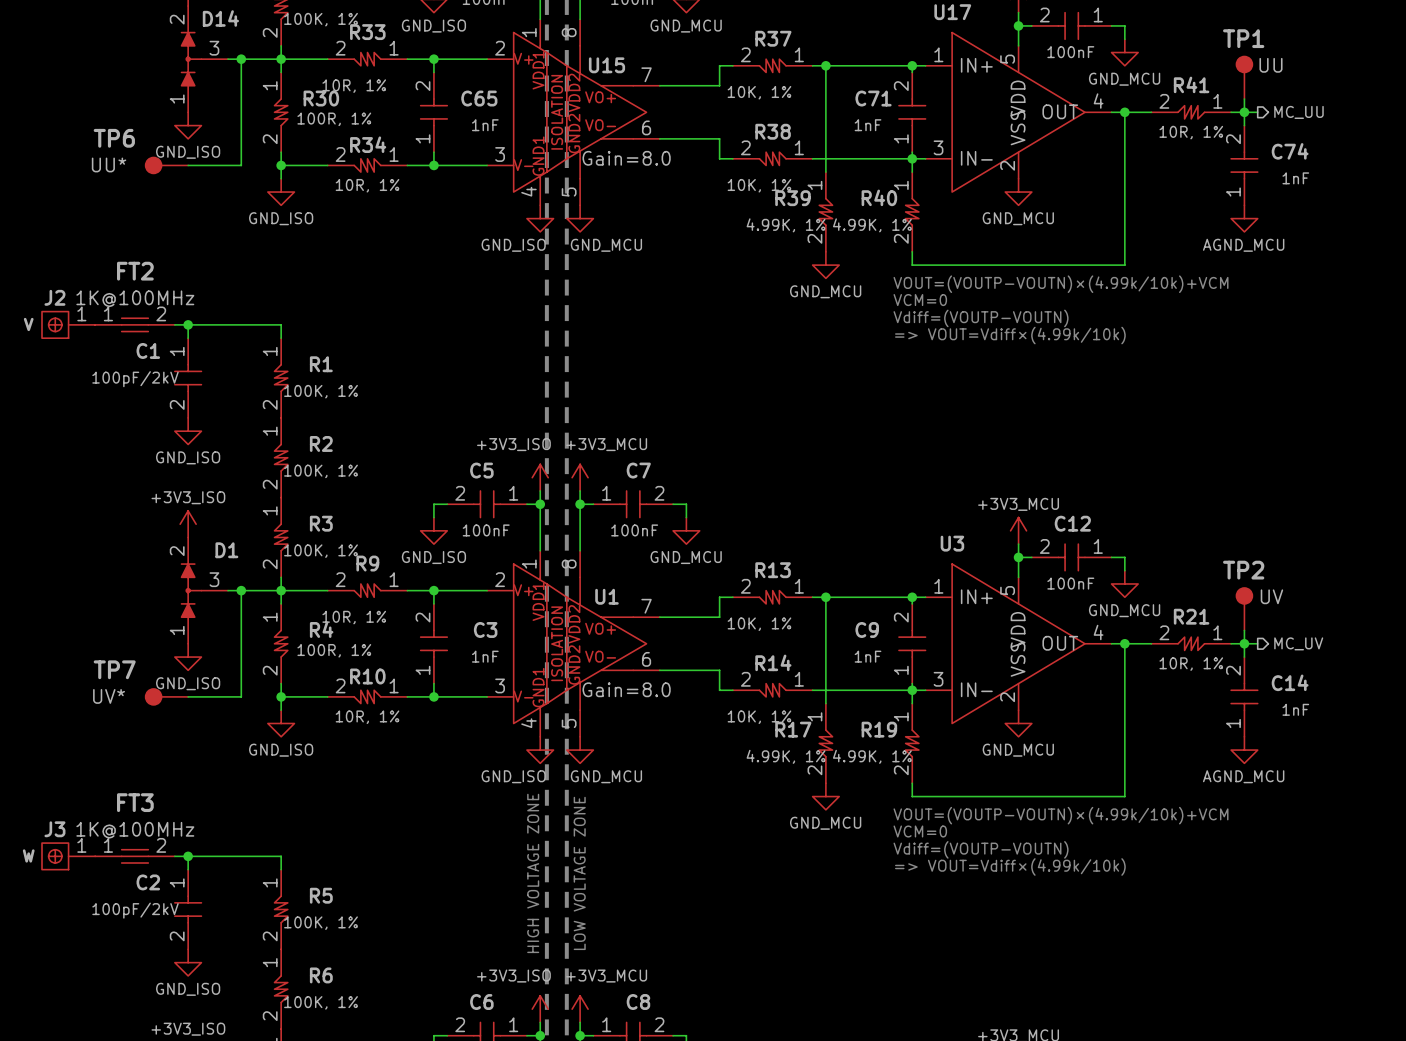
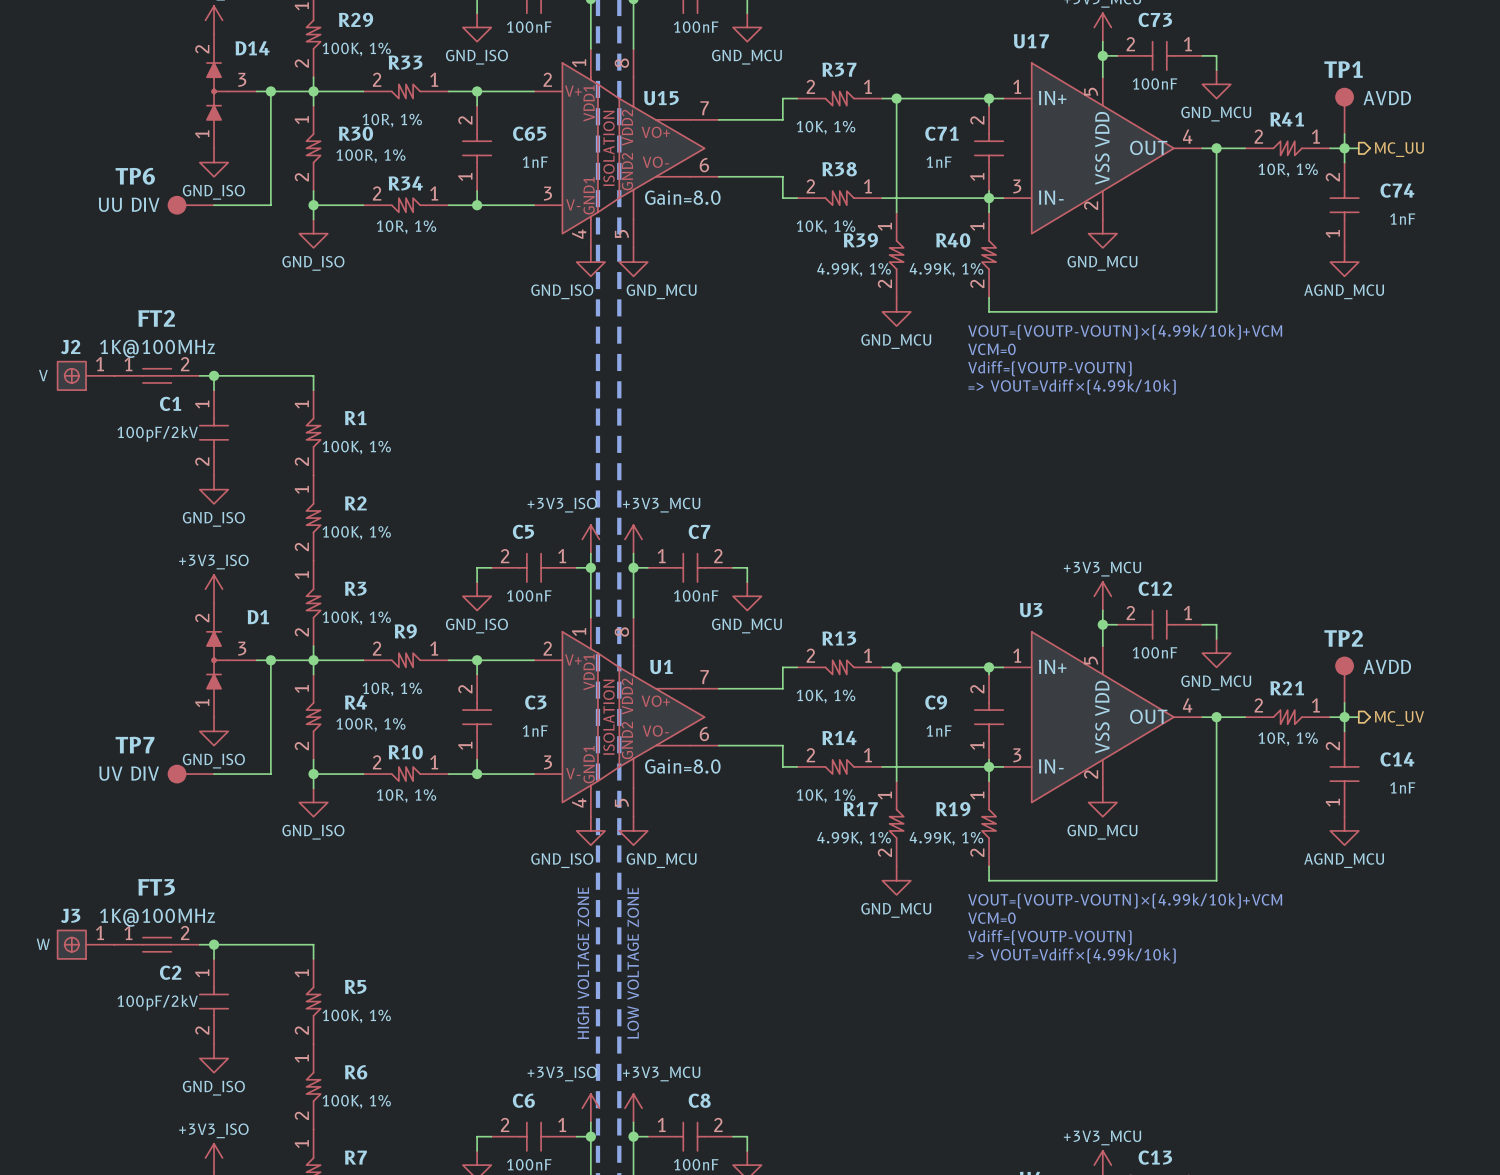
TP1 value: UU (1271, 65) -> AVDD (1387, 98)
TP6 value: UU* (109, 164) -> UU DIV (129, 204)
TP2 value: UV (1271, 596) -> AVDD (1387, 666)
TP7 value: UV* (109, 696) -> UV DIV (129, 773)

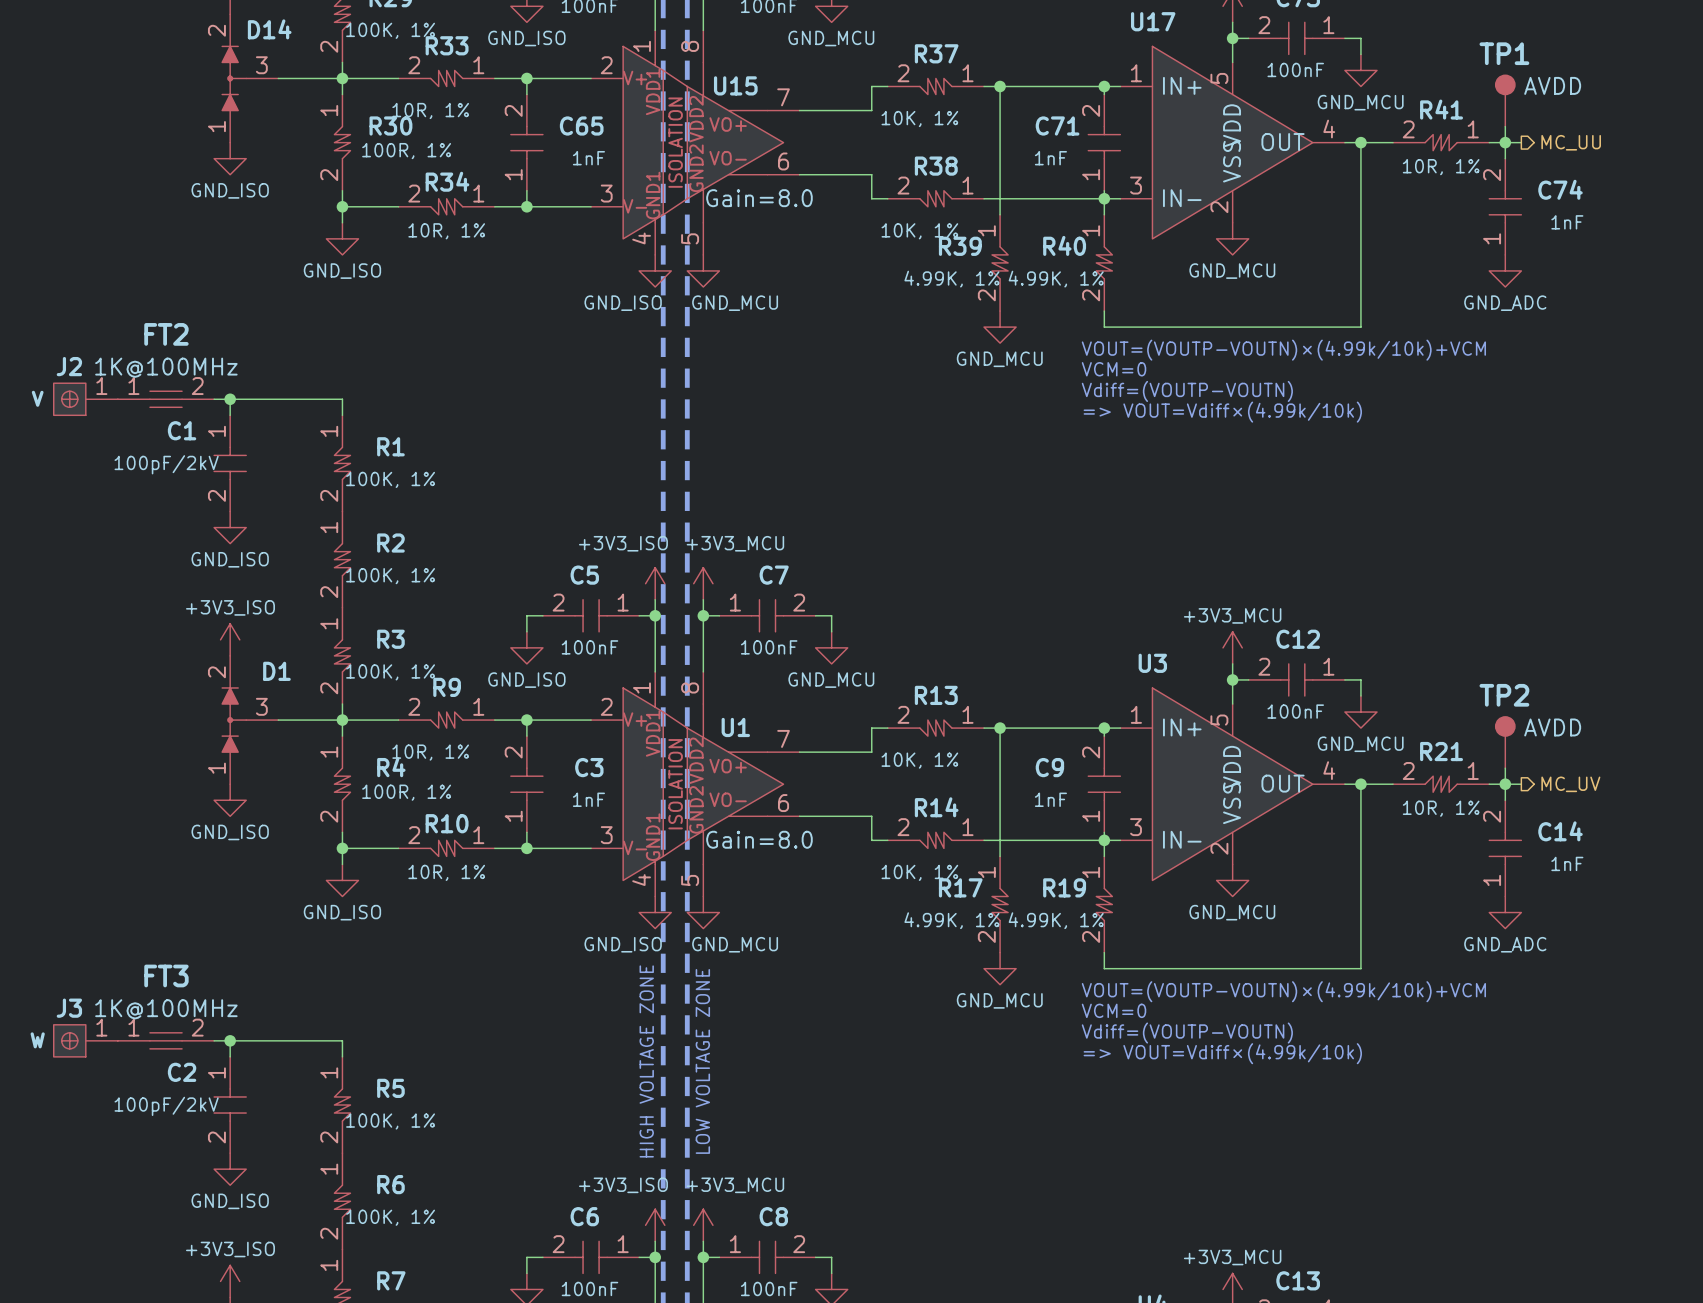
wire: (270, 91) (270, 205) (214, 205) -> none
junction: (270, 91) -> none
TP6: UU DIV (191, 205) -> none
power symbol: AGND_MCU (1344, 262) -> GND_ADC (1505, 270)
wire: (270, 660) (270, 774) (214, 774) -> none
junction: (270, 660) -> none
TP7: UV DIV (191, 774) -> none
power symbol: AGND_MCU (1344, 830) -> GND_ADC (1505, 912)

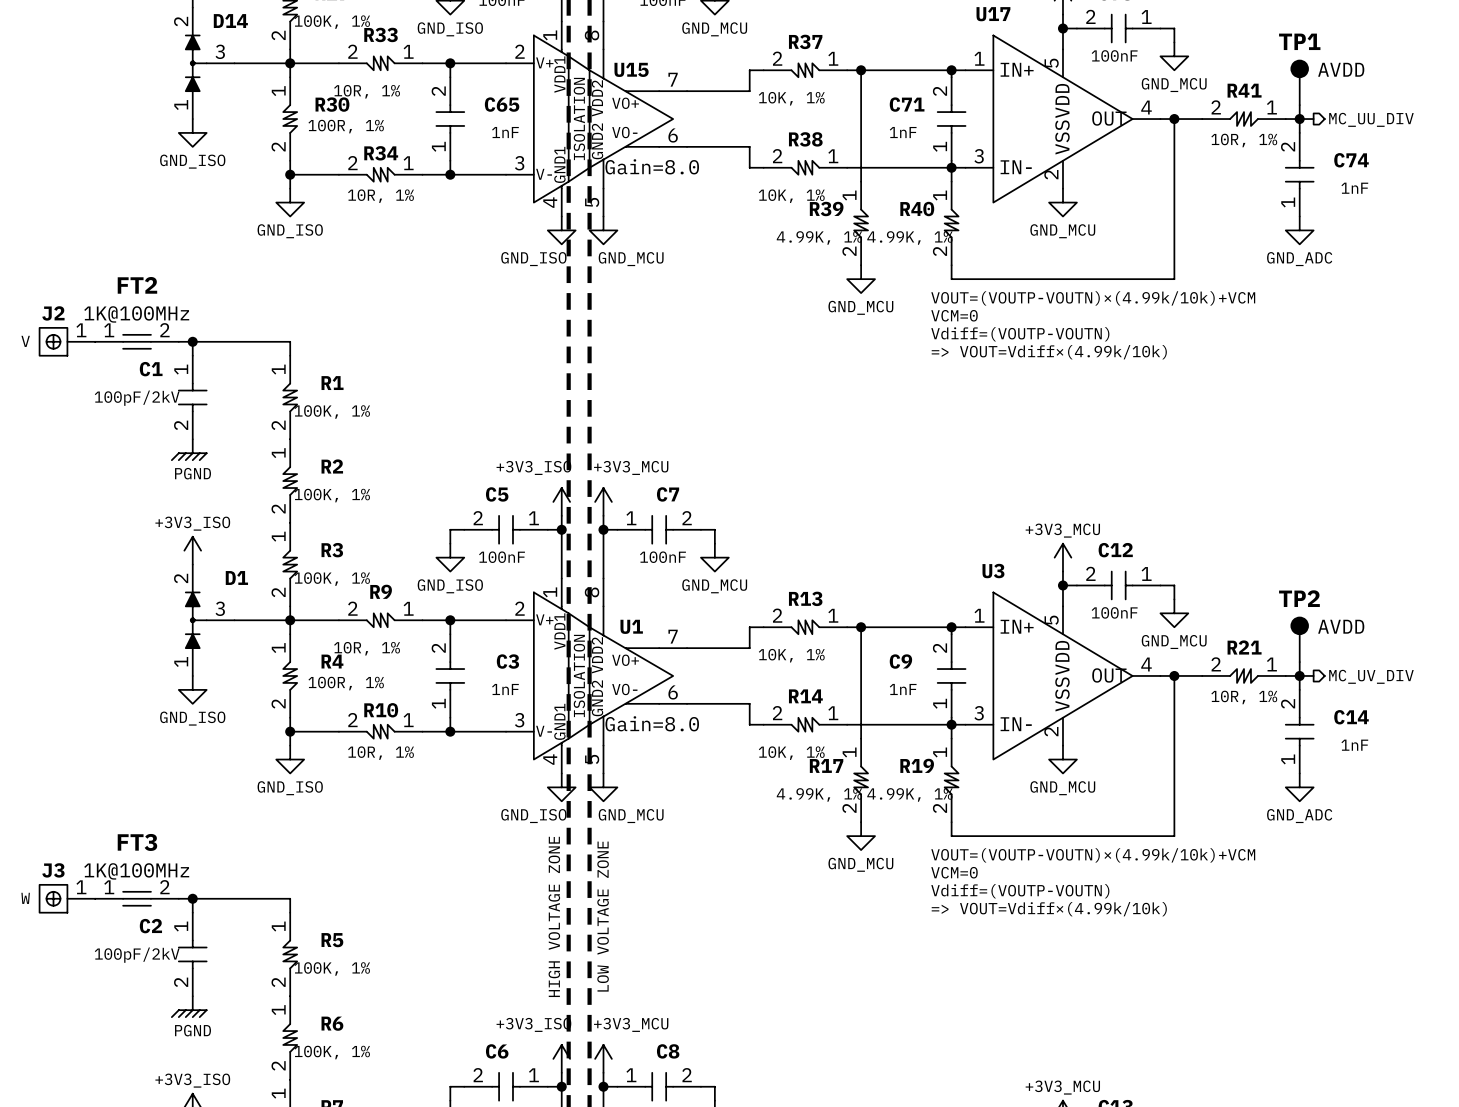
hierarchical label: MC_UU (1571, 142) -> MC_UU_DIV (1371, 119)
power symbol: GND_ISO (230, 527) -> PGND (189, 449)
hierarchical label: MC_UV (1570, 784) -> MC_UV_DIV (1371, 676)
power symbol: GND_ISO (230, 1169) -> PGND (189, 1006)

